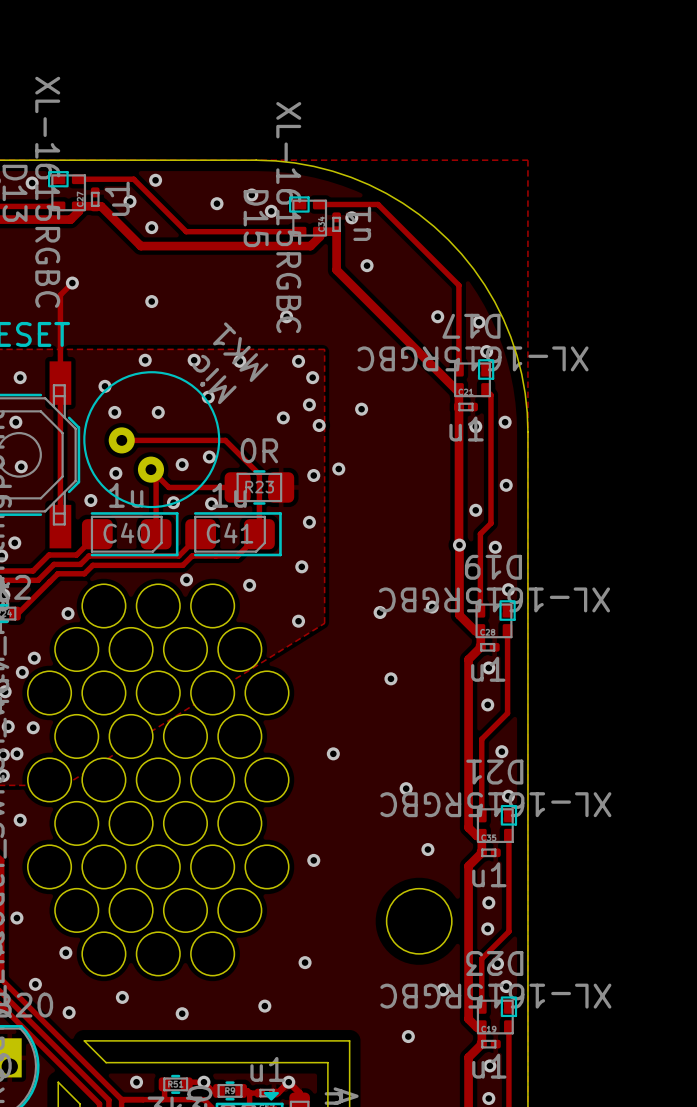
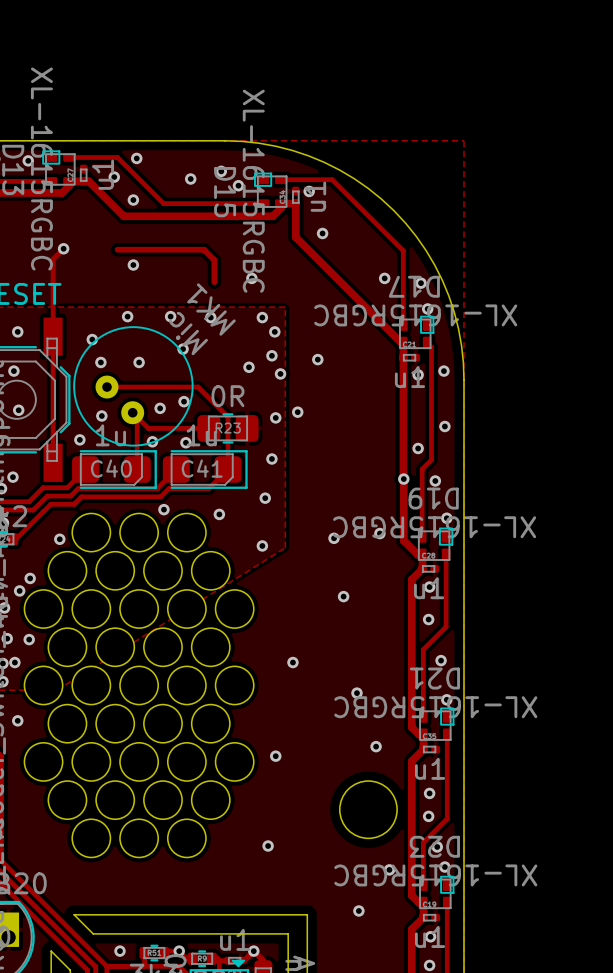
track: none -> (117, 249) (203, 249) (214, 260) (214, 282)
via: (16, 918) -> none
via: (65, 952) -> none
via: (35, 984) -> none
via: (122, 997) -> none
via: (264, 1006) -> none
via: (69, 1012) -> none
via: (182, 1013) -> none

